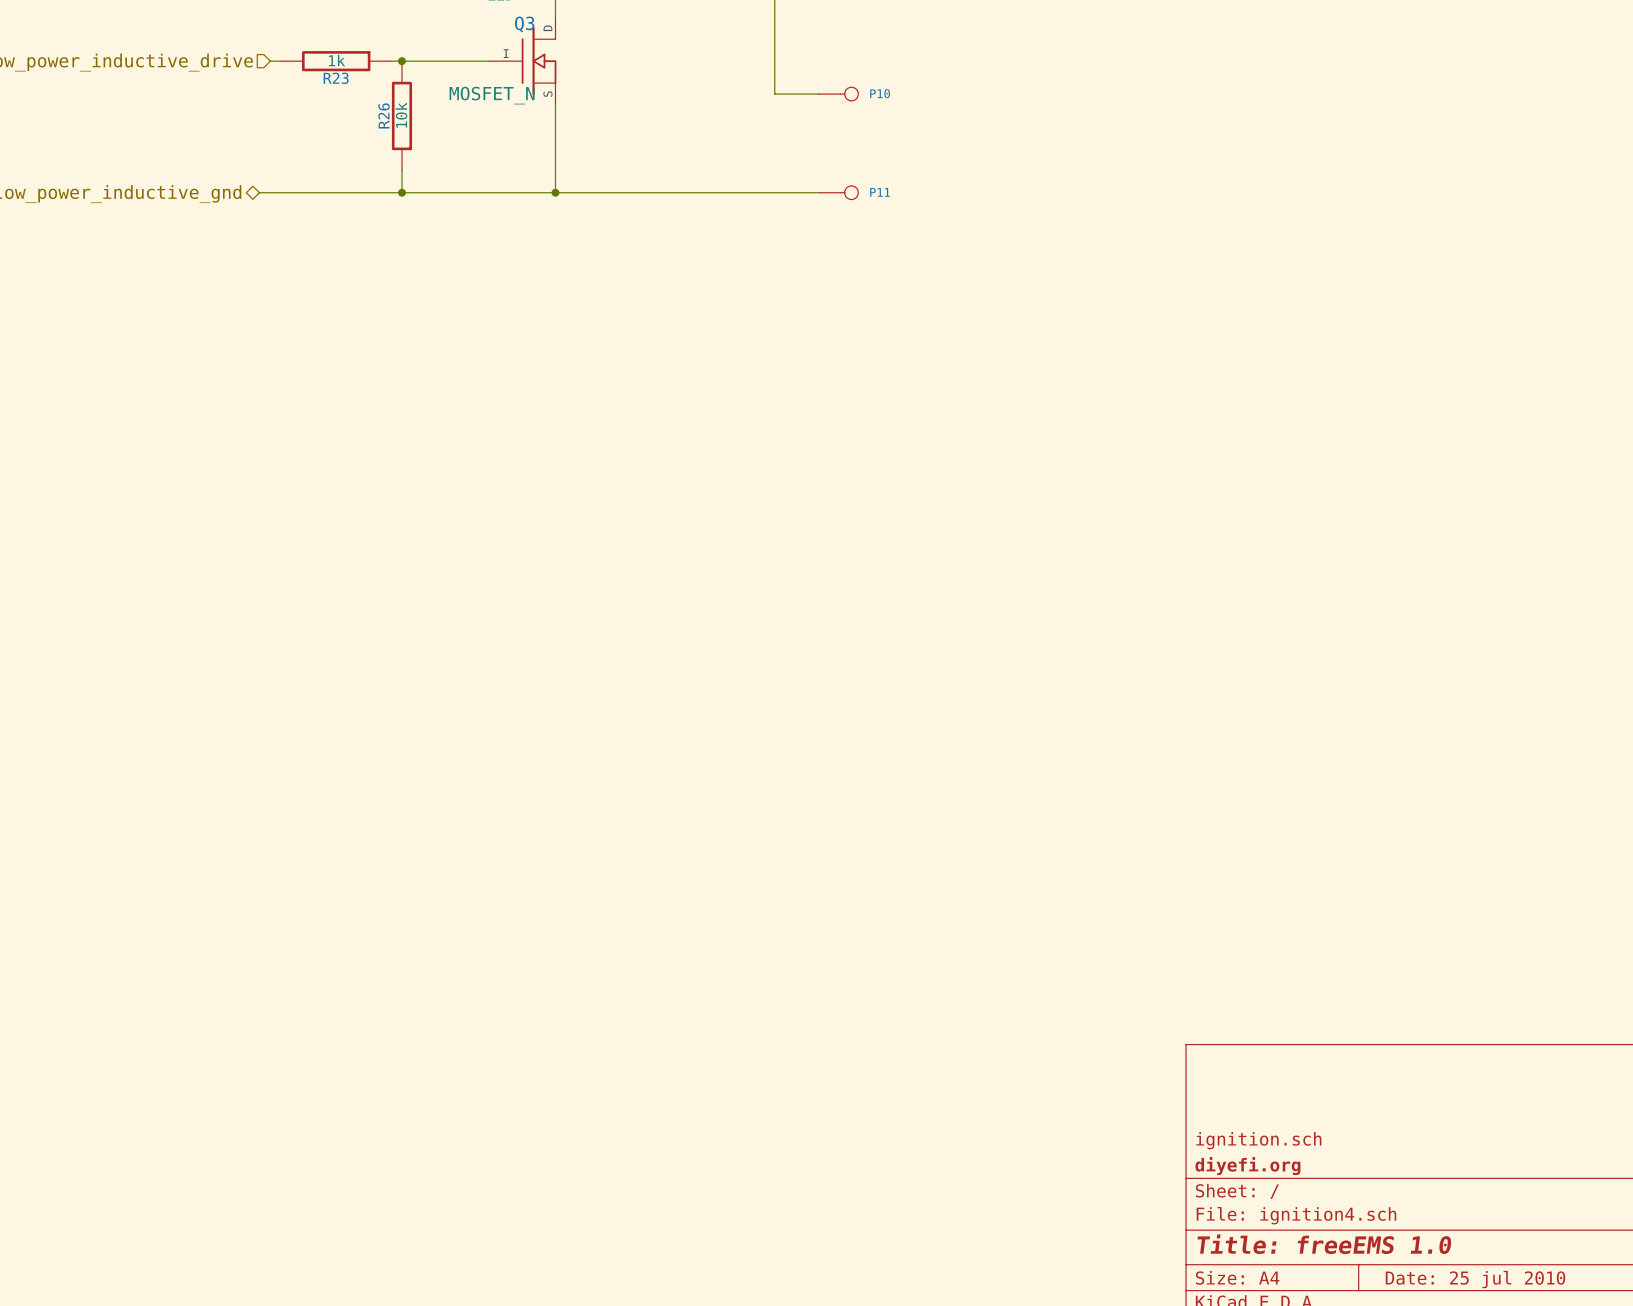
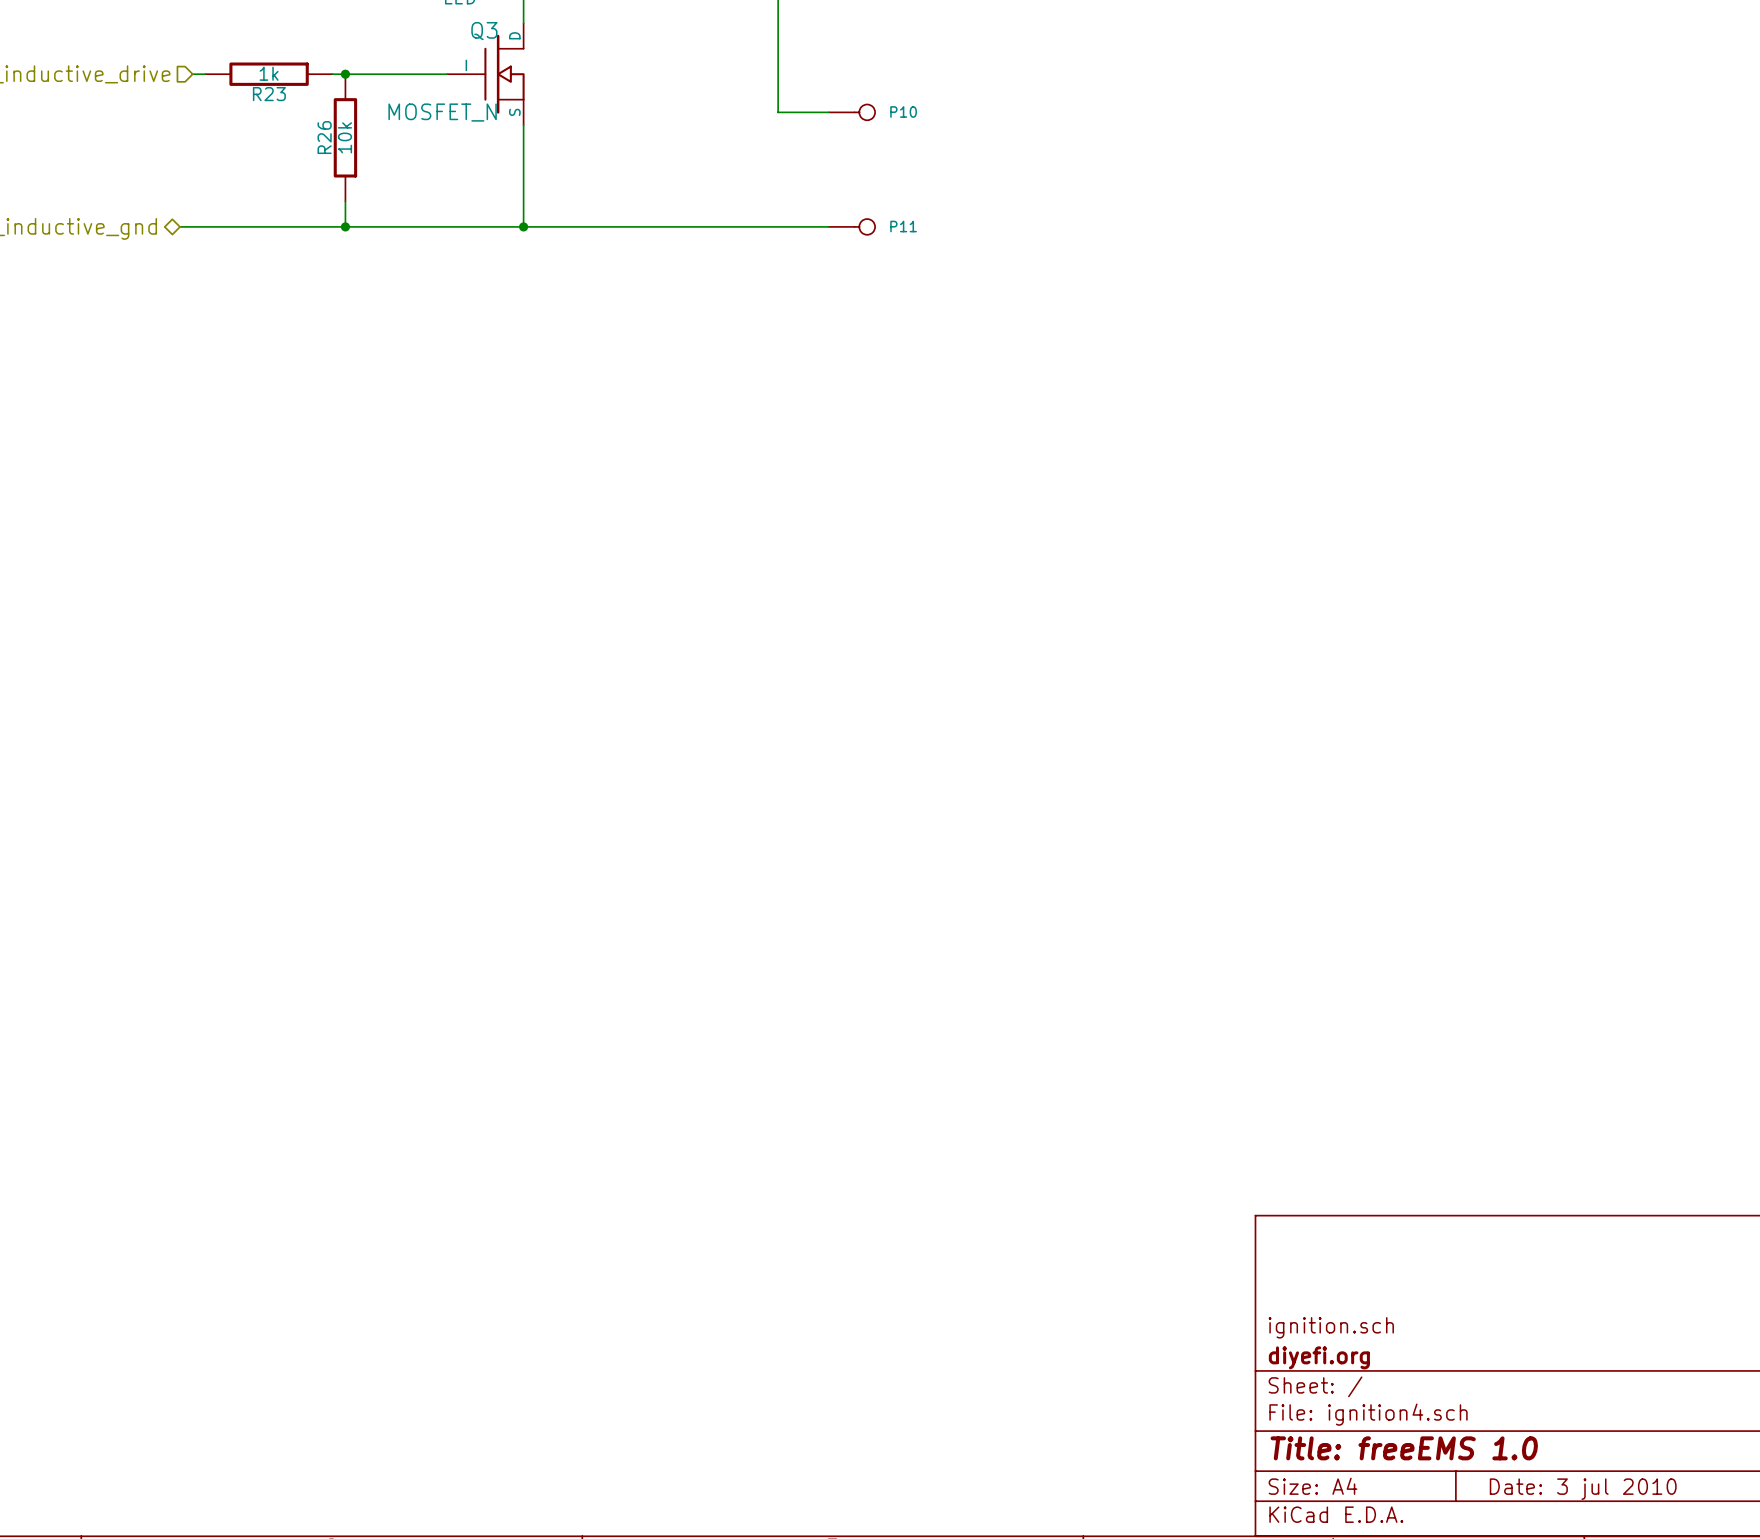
title block: Date: 25 jul 2010 (1475, 1279) -> Date: 3 jul 2010 (1583, 1489)

